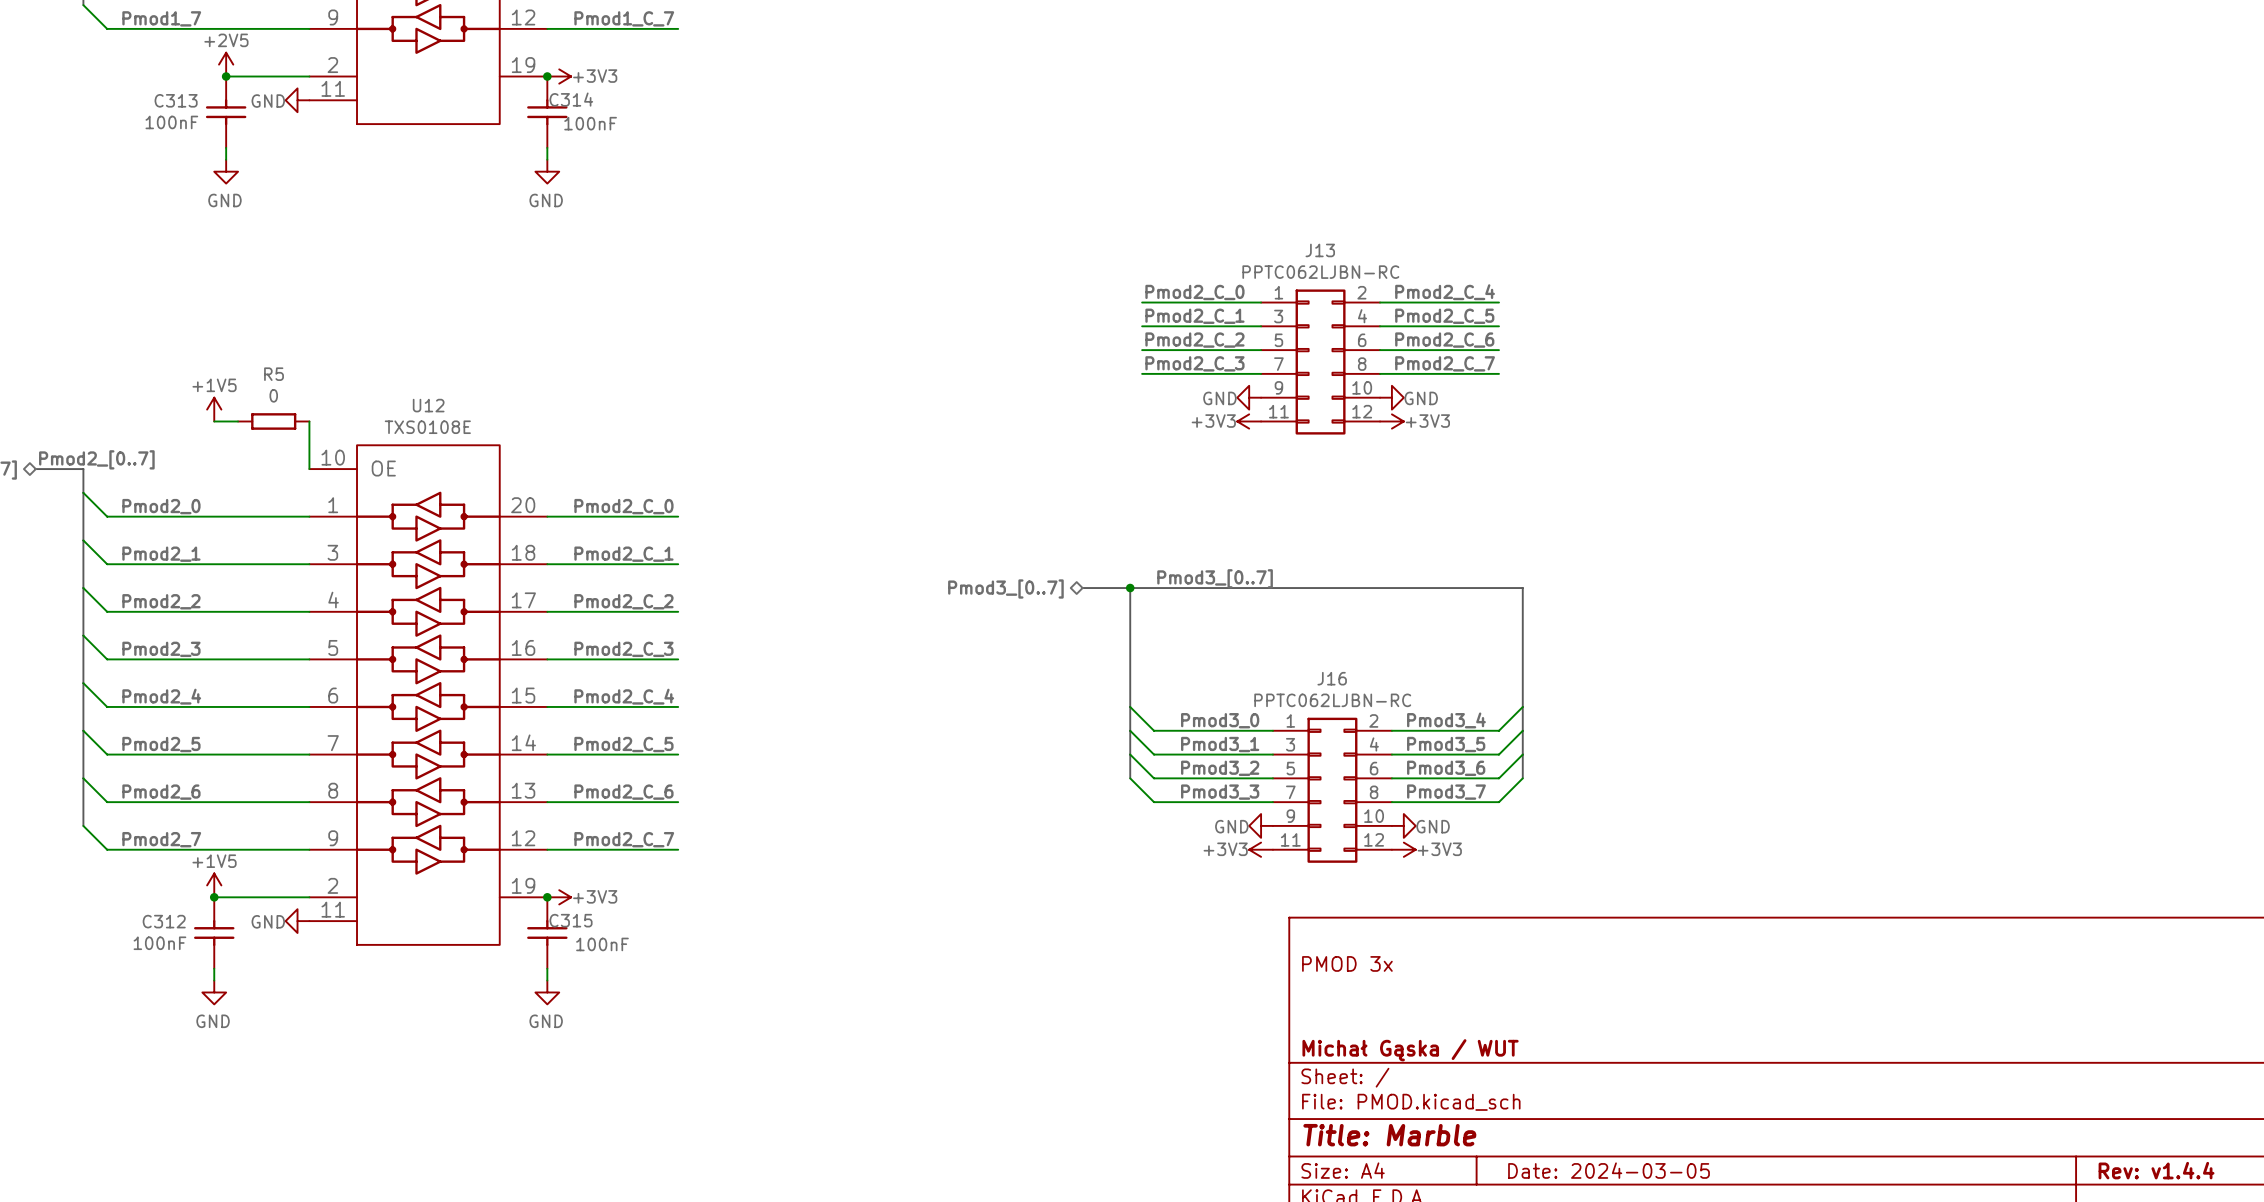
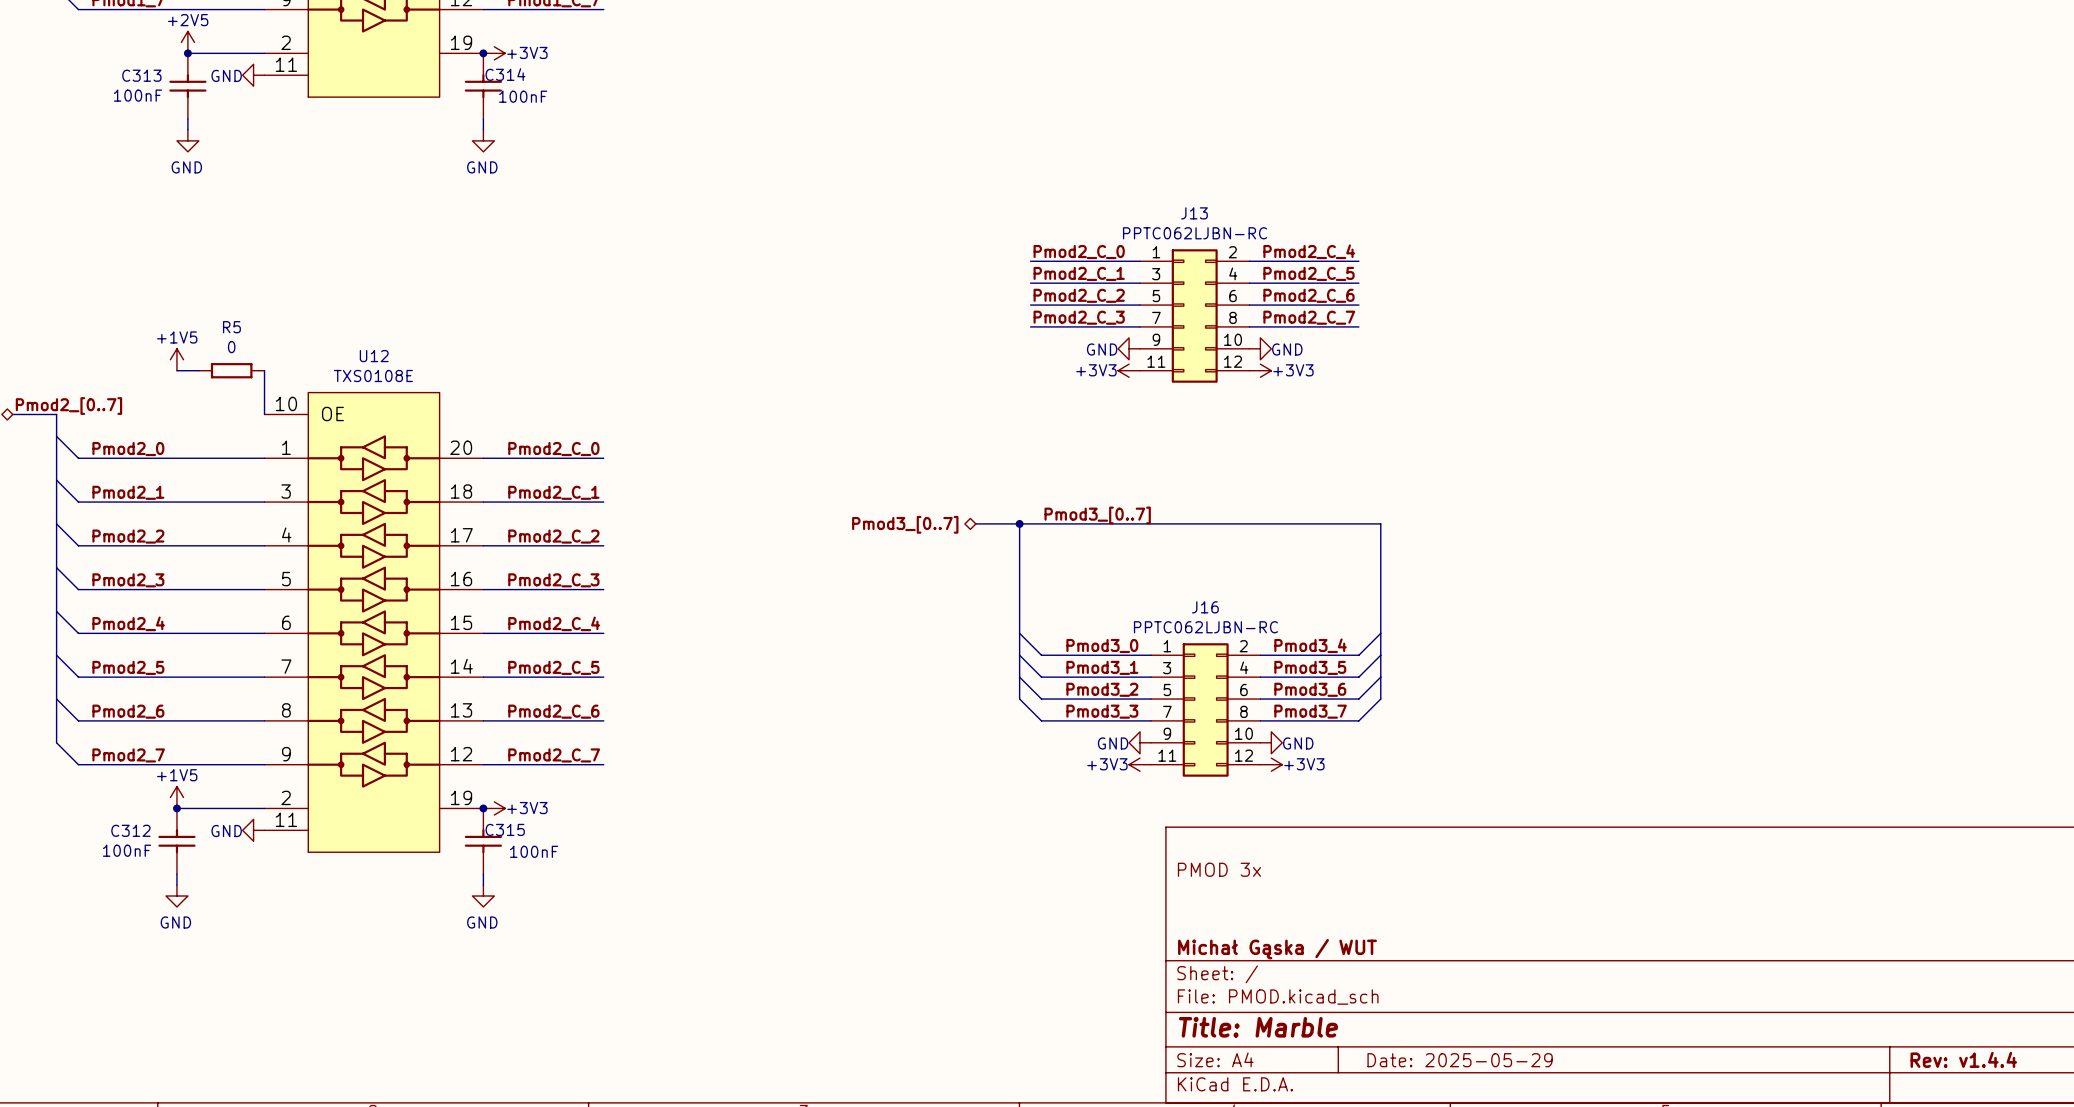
title block: Date: 2024-03-05 (1609, 1170) -> Date: 2025-05-29 (1460, 1060)

